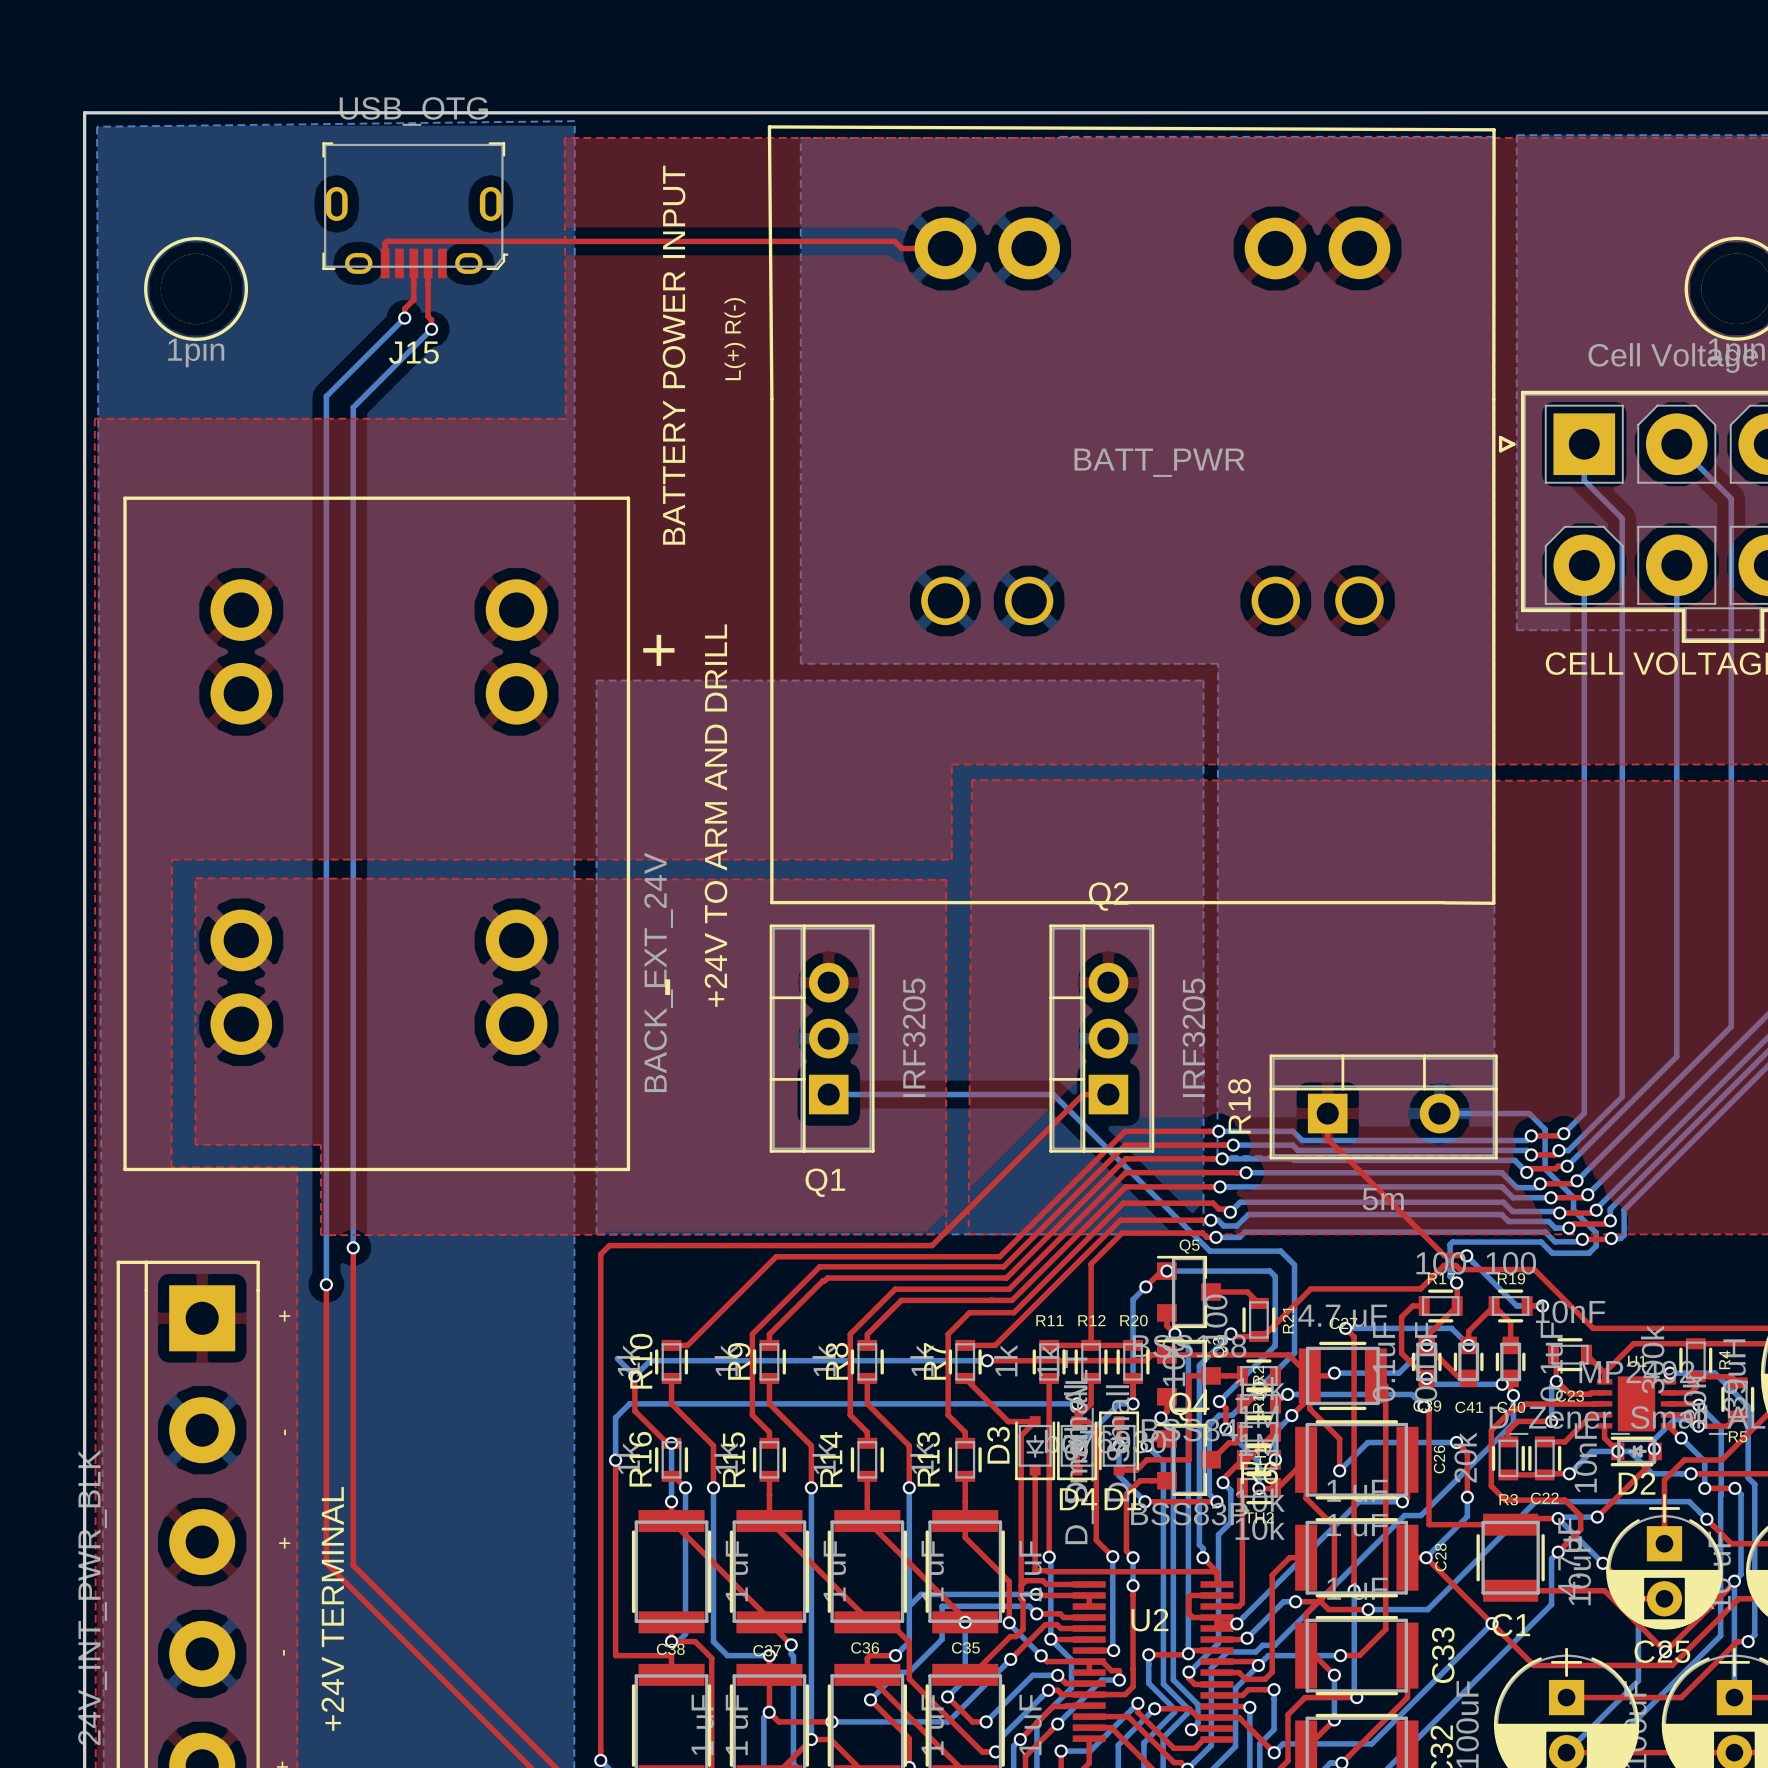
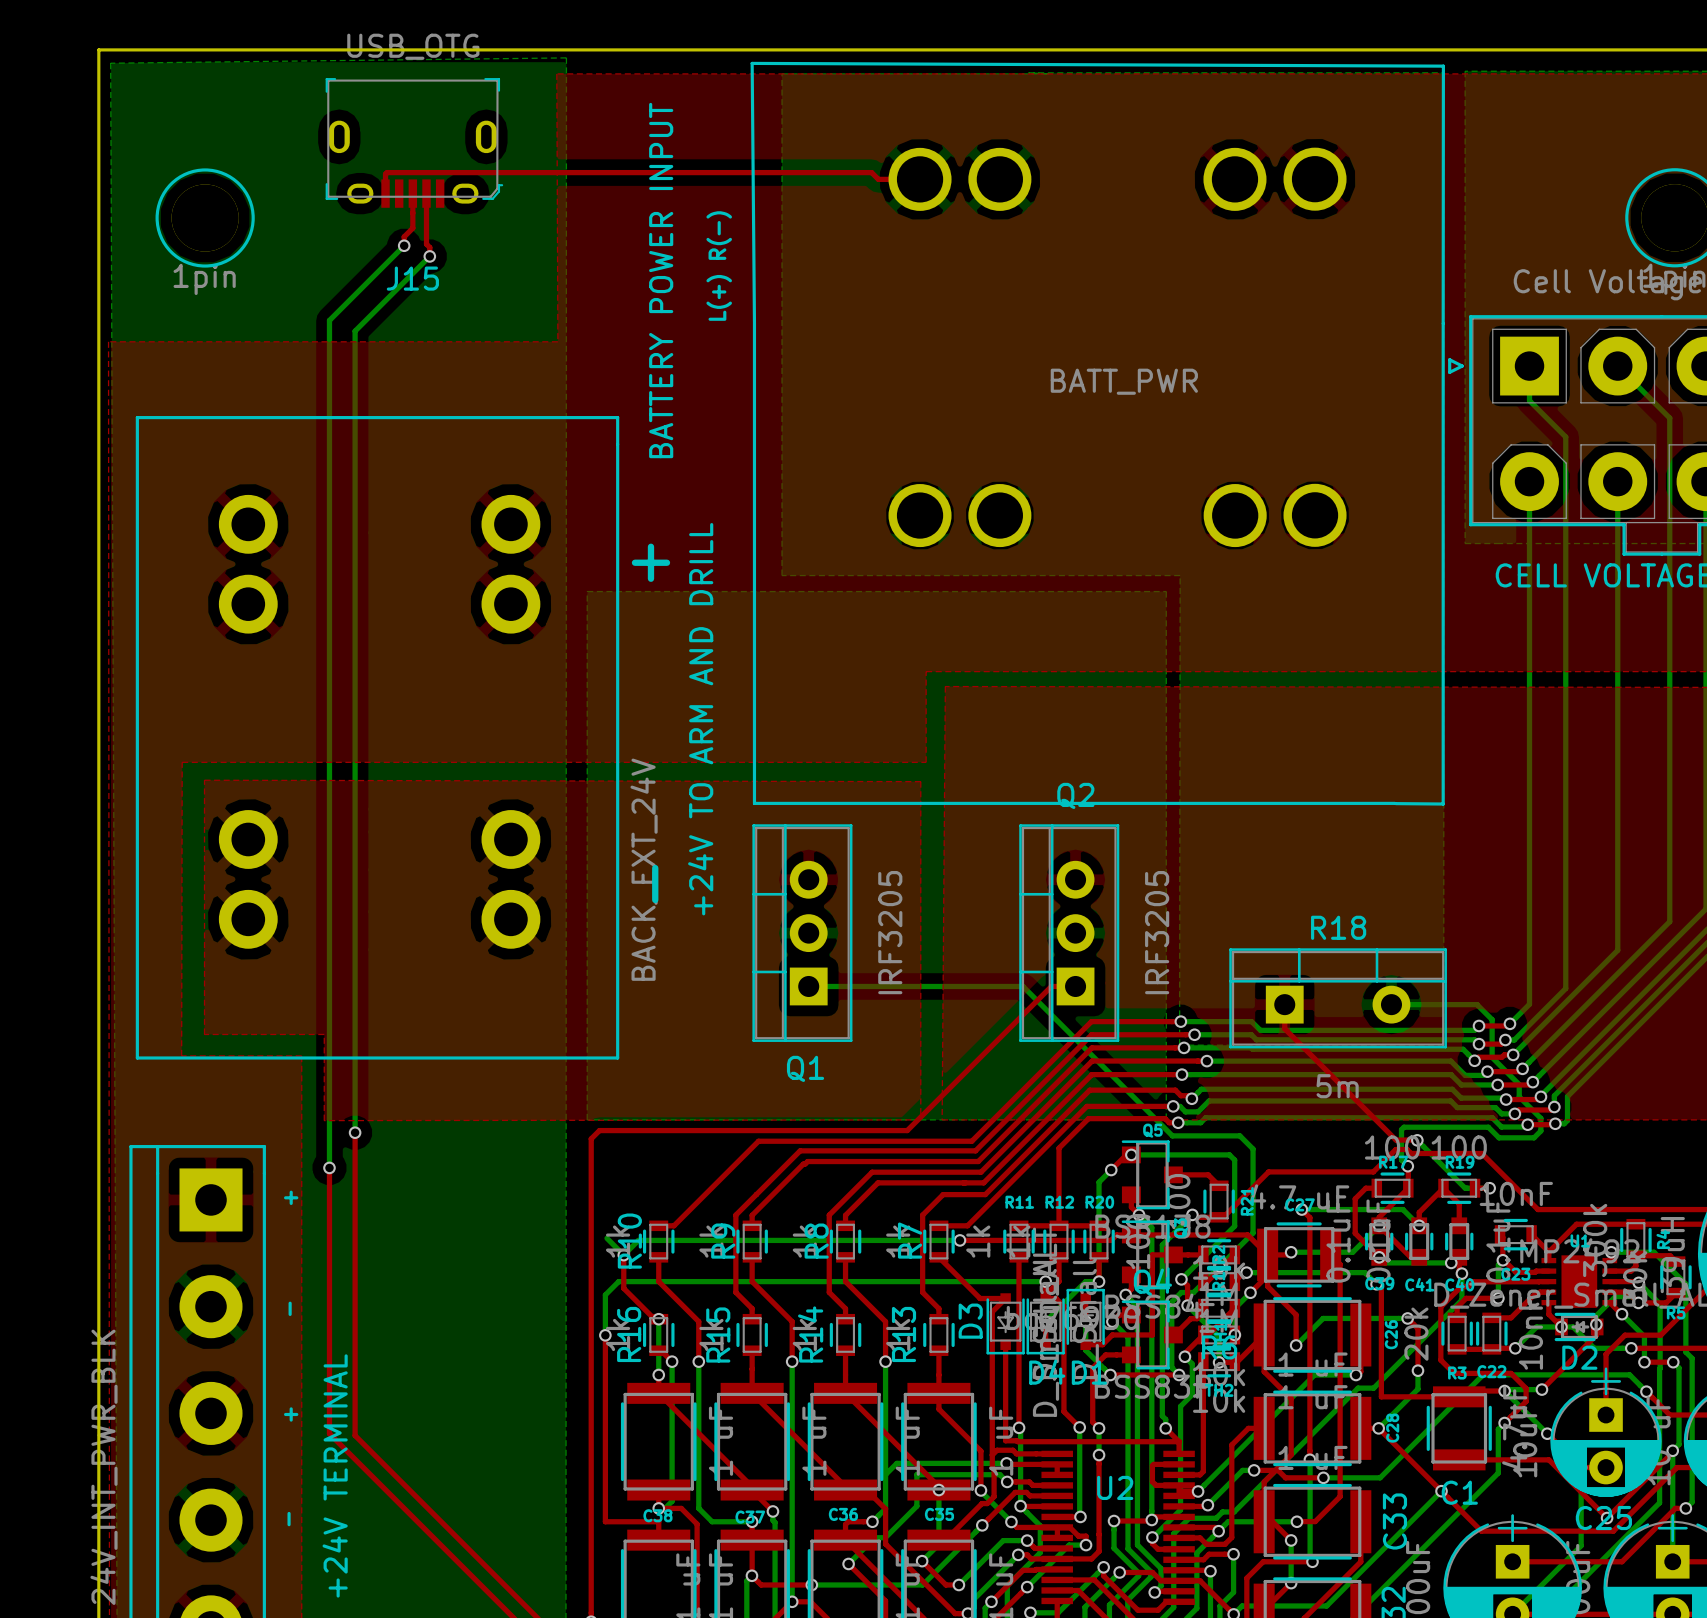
BATTERY POWER INPUT footprint: [767, 125, 1496, 905] -> [750, 61, 1445, 806]
R18 name rotation: 0° (1239, 1106) -> 90° clockwise (1338, 927)
R18 name position: R18 (1239, 1106) -> R18 (1338, 927)

